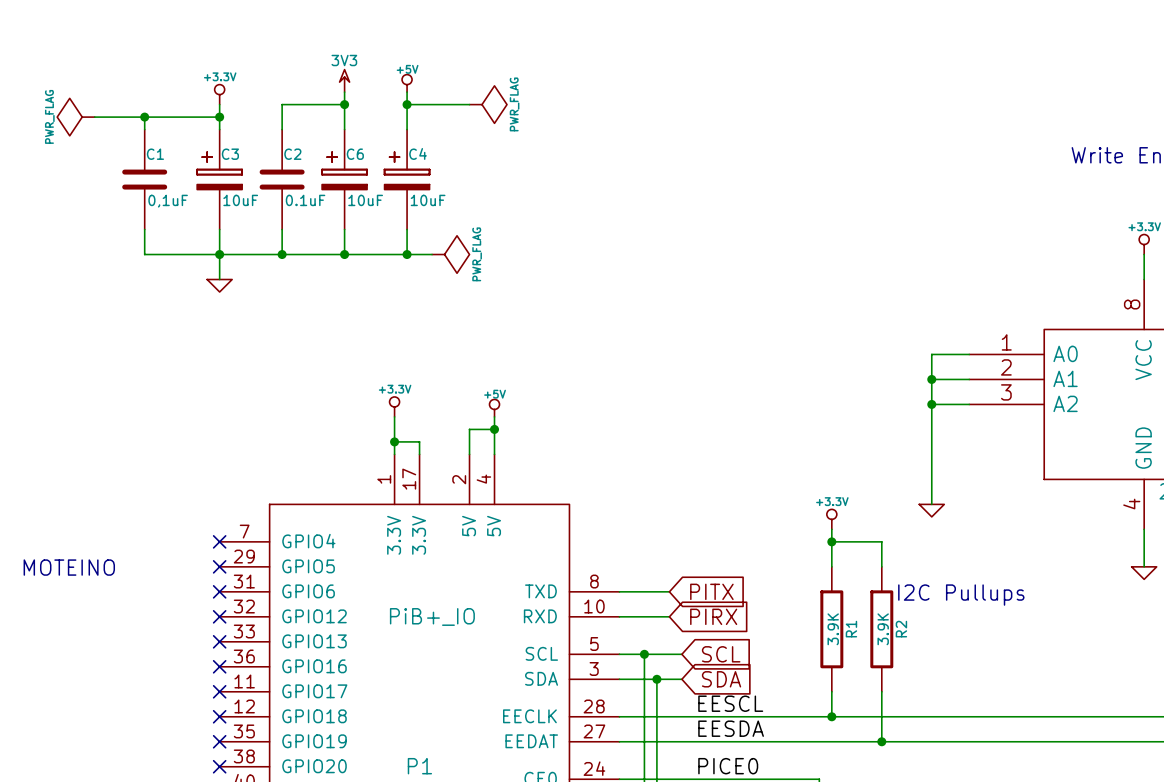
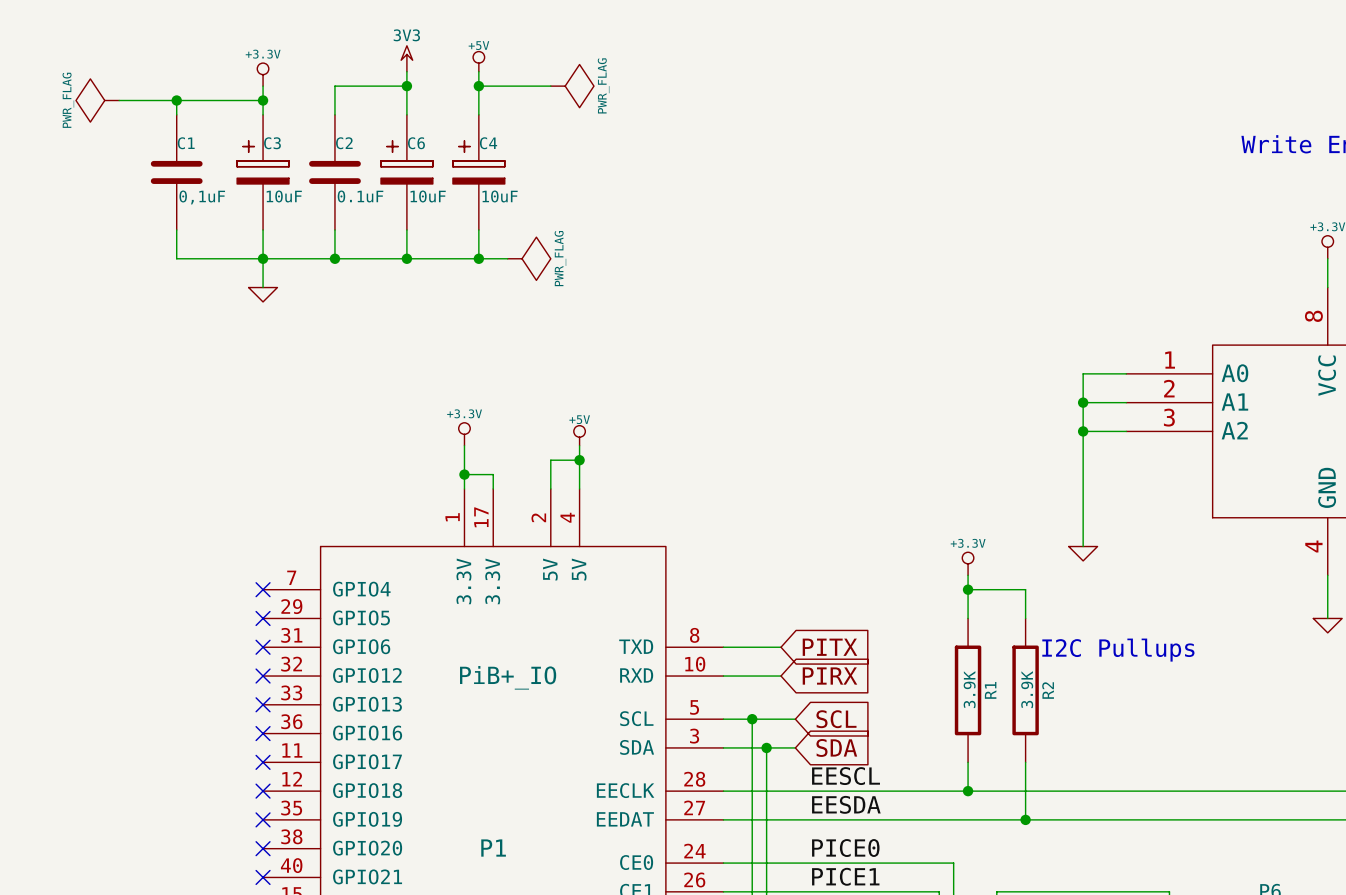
text: MOTEINO (69, 567) -> none

